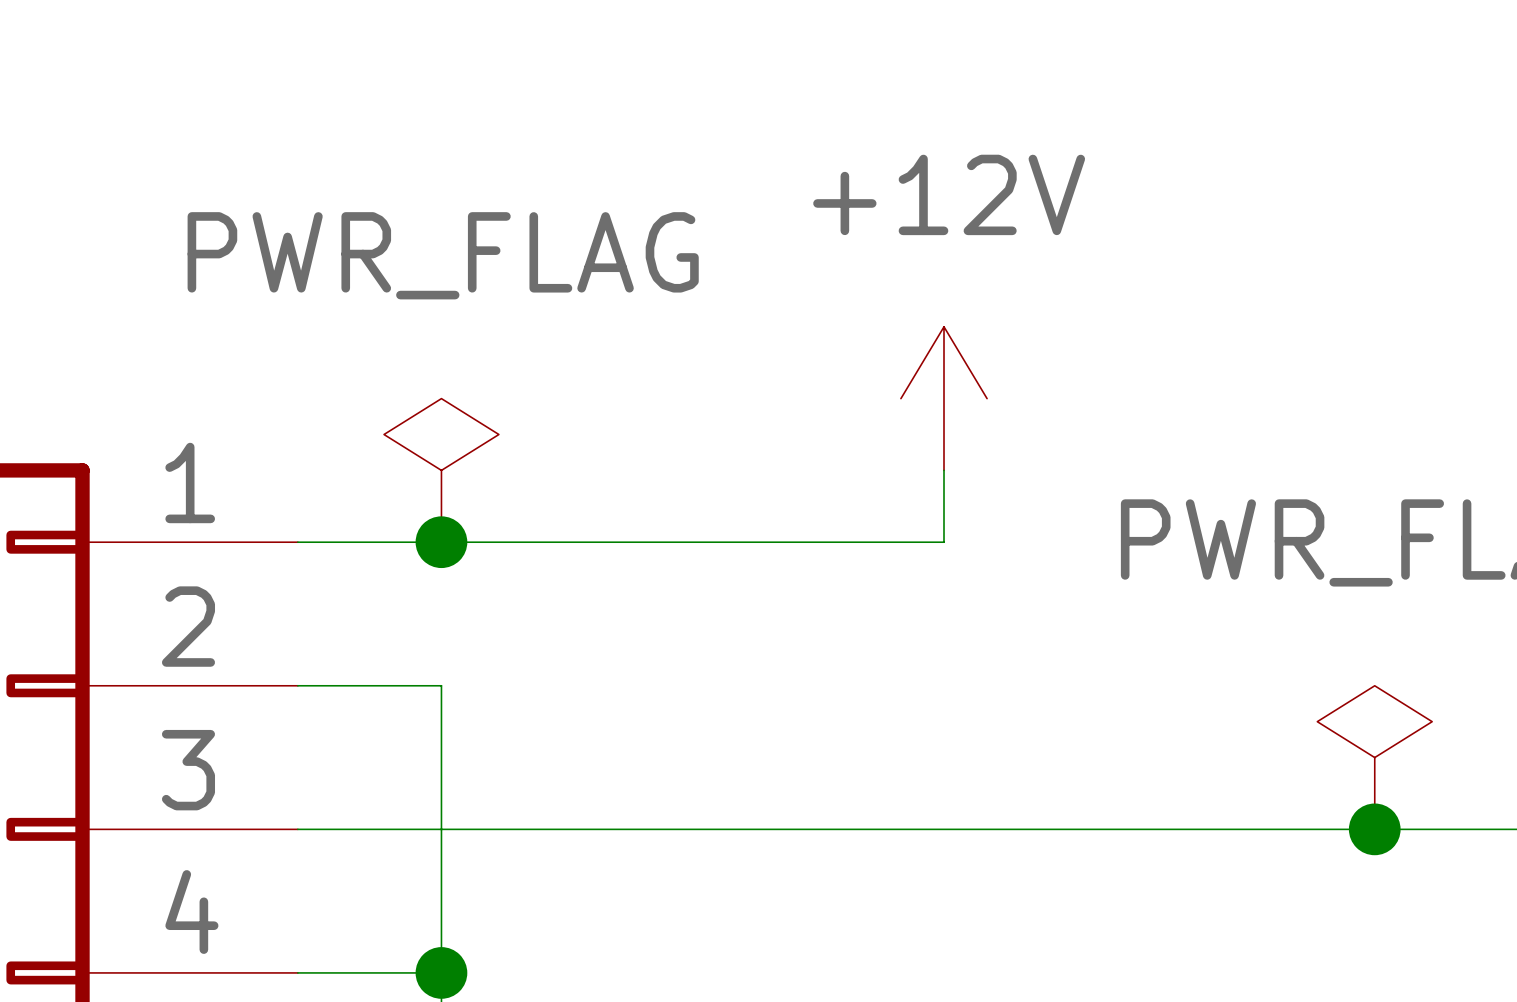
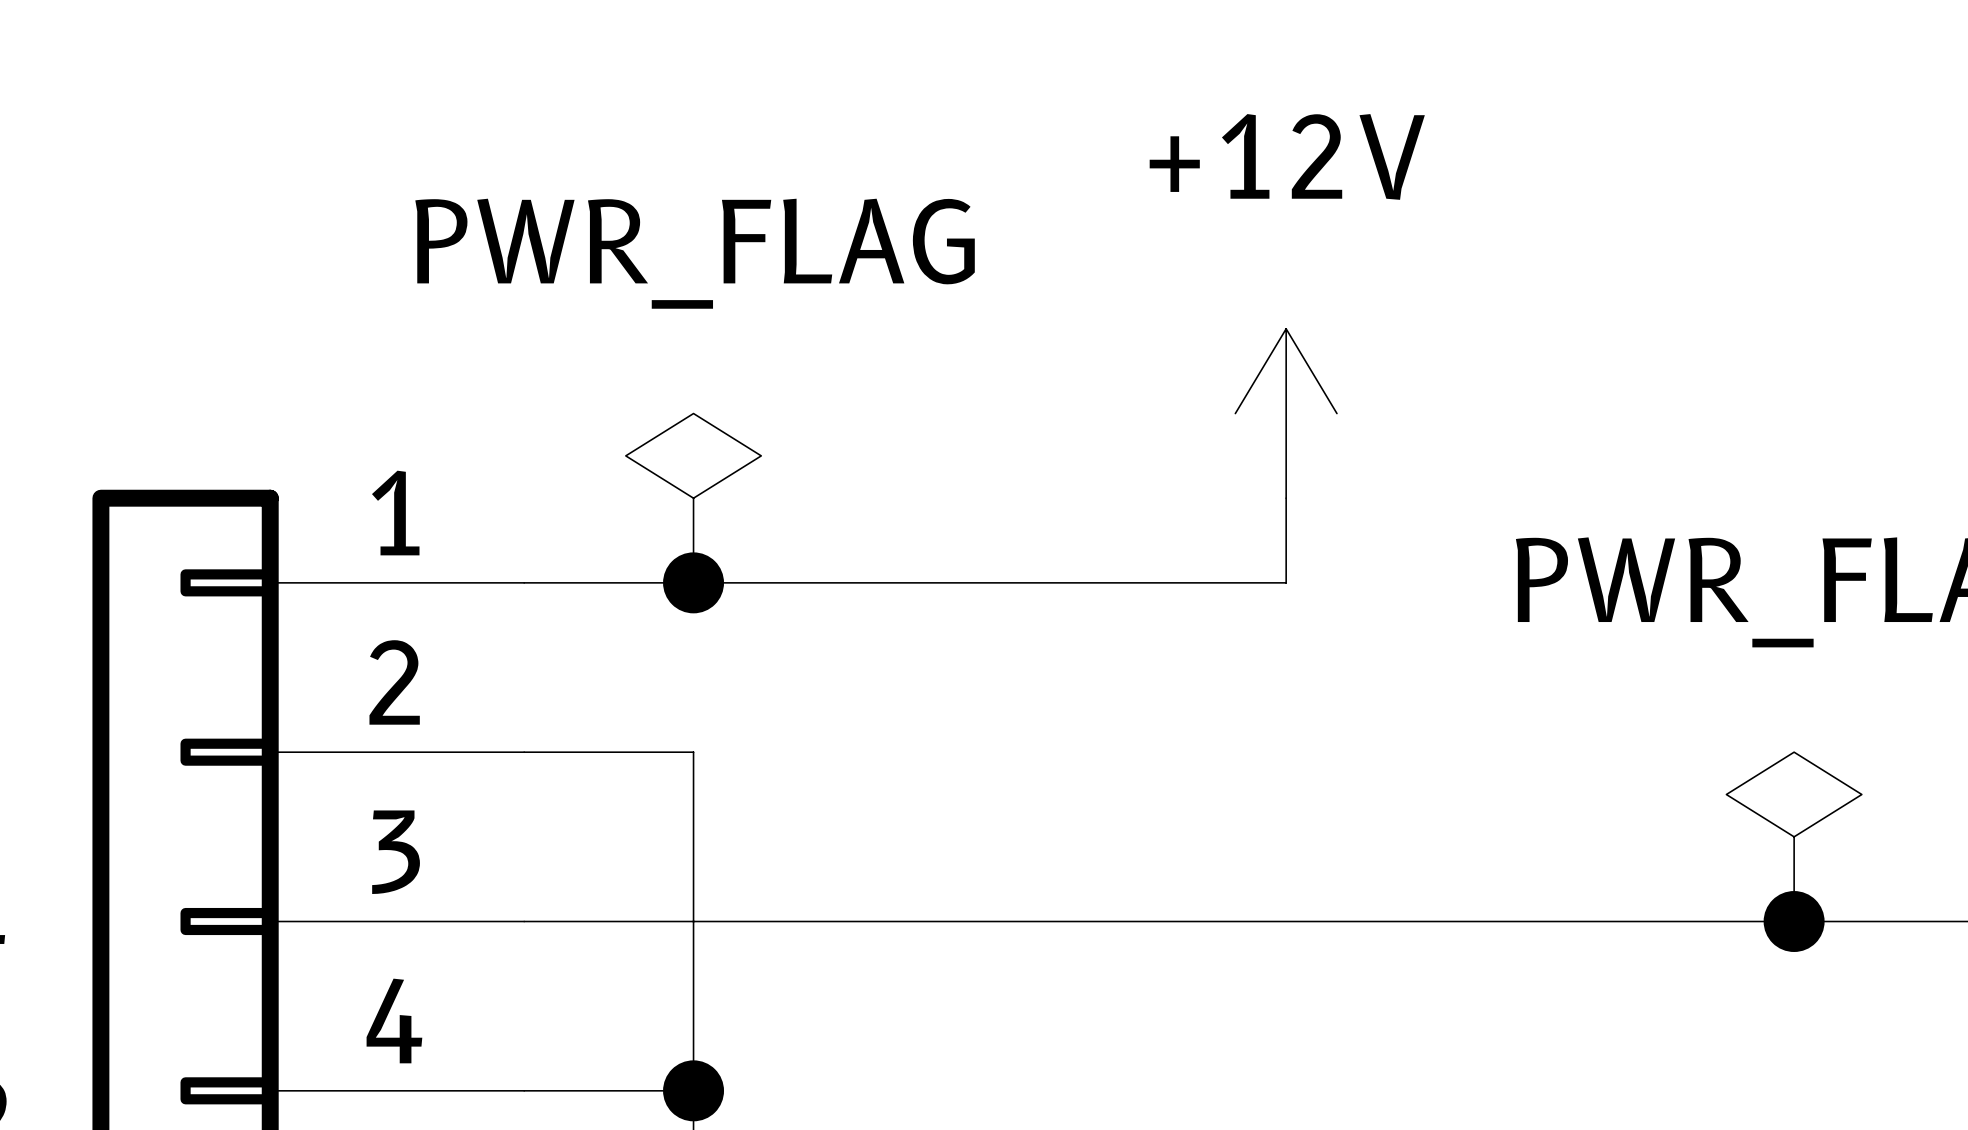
power symbol text position: +12V (949, 194) -> +12V (1287, 156)

